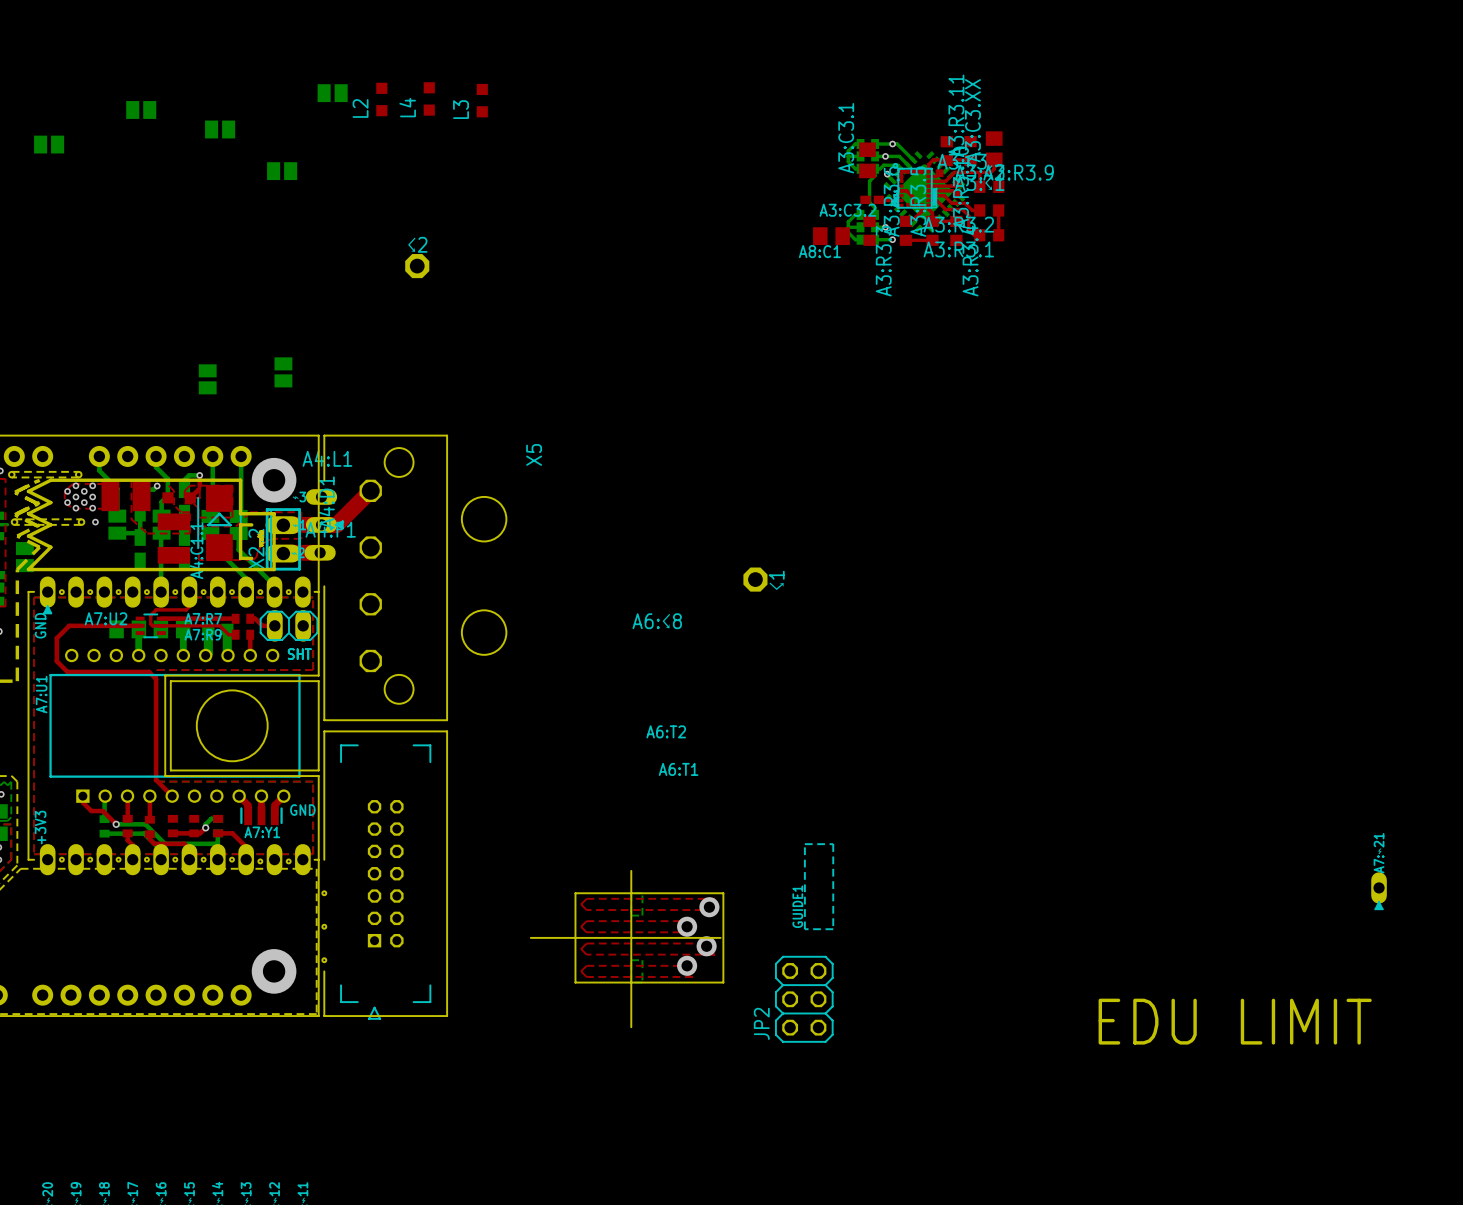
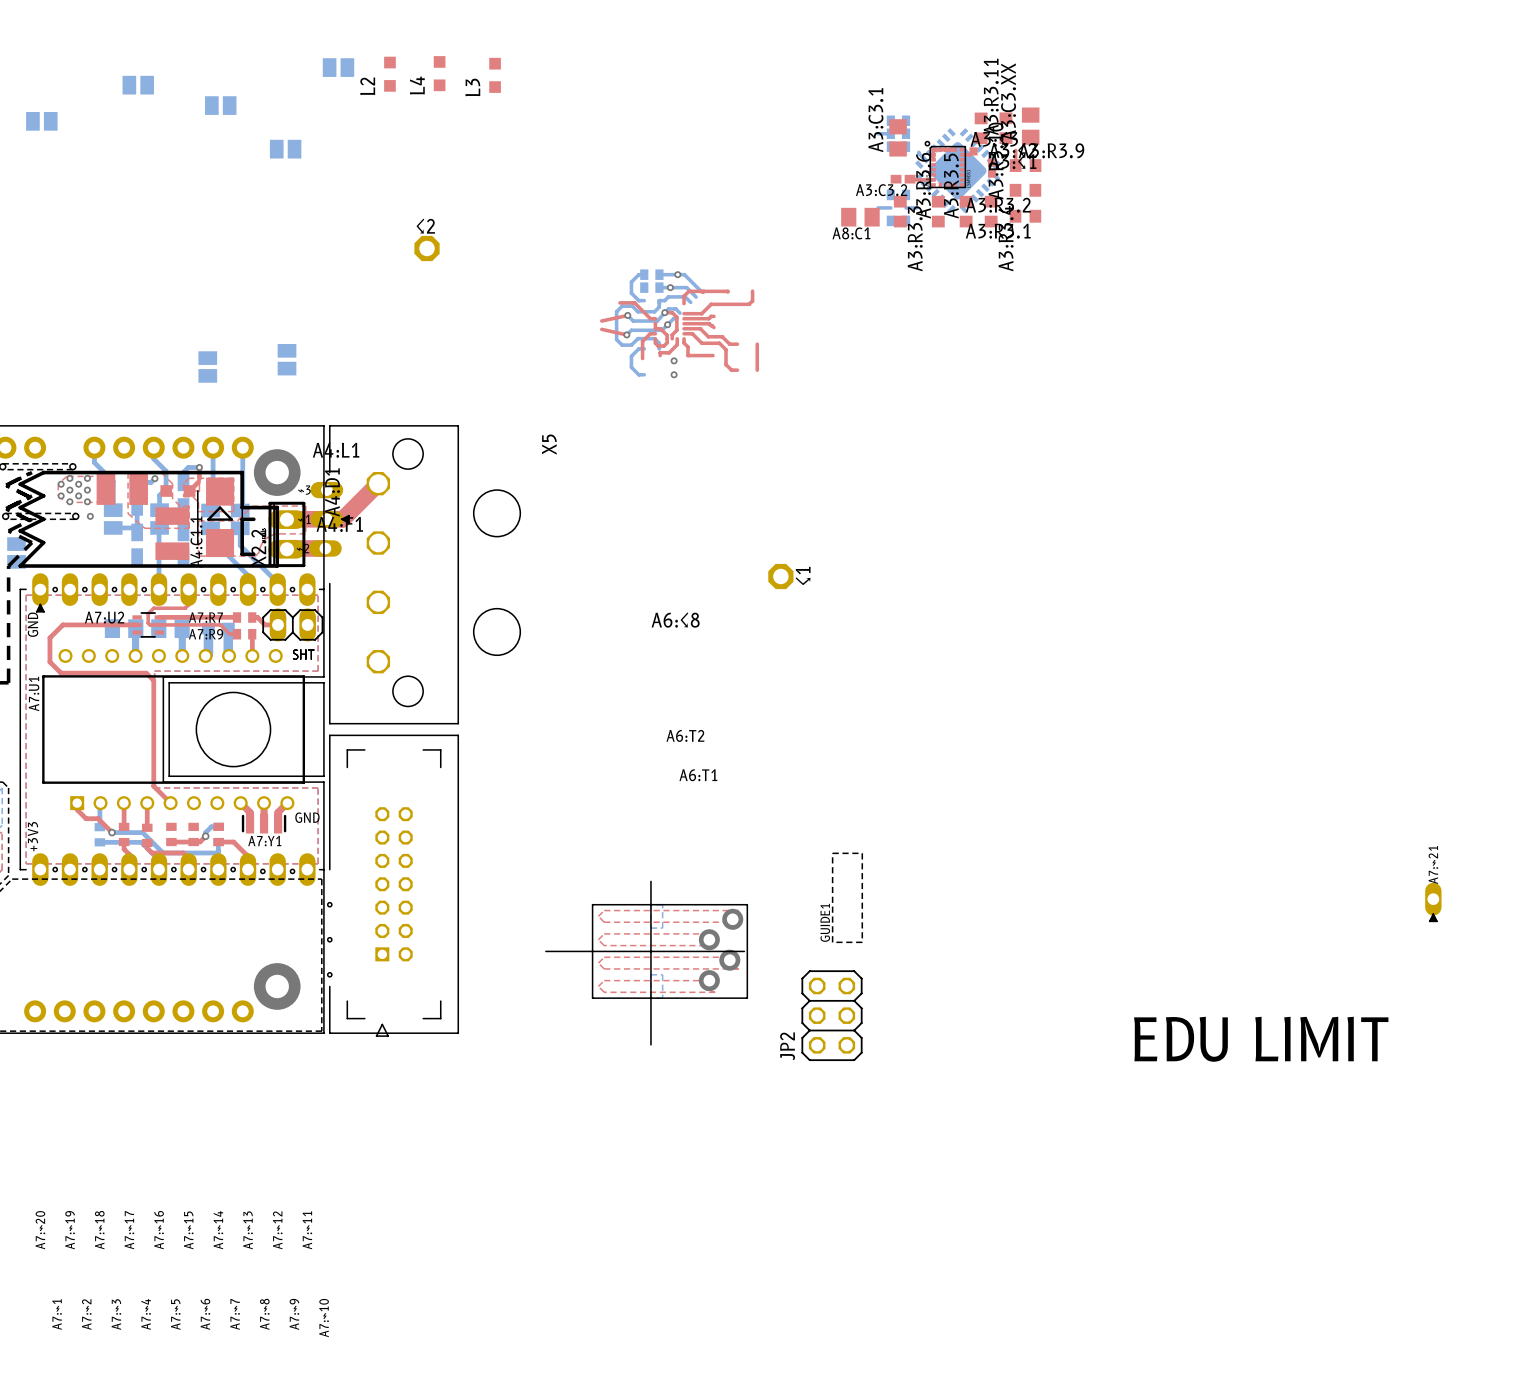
bottom track: (860, 144) (855, 144) (848, 151) (848, 161) (855, 168) (860, 168) -> (644, 274) (638, 274) (631, 282) (631, 293) (638, 300) (644, 300)
via: (892, 144) -> none
bottom track: (875, 145) (875, 144) (897, 144) (913, 160) -> none
bottom track: (875, 156) (899, 156) (908, 165) -> none
via: (885, 156) -> none
top track: (994, 159) (994, 169) (990, 172) (954, 172) (945, 181) (928, 181) -> none
top track: (970, 160) (933, 159) (928, 164) (928, 171) -> none
bottom track: (875, 168) (880, 168) (883, 165) (897, 165) (903, 170) -> none
bottom track: (875, 168) (874, 175) (869, 181) (869, 202) (875, 207) (875, 214) -> none
via: (887, 174) -> none
top track: (957, 183) (952, 186) (928, 186) -> none
top track: (901, 190) (906, 190) (912, 196) (912, 205) -> none
top track: (928, 190) (952, 190) (957, 194) -> none
top track: (928, 195) (944, 195) (951, 203) (965, 203) (972, 210) (979, 210) -> none
top track: (928, 200) (936, 200) (945, 209) (962, 209) (968, 215) (968, 229) (974, 235) (979, 235) -> none
top track: (922, 205) (922, 210) (914, 218) (905, 218) (905, 221) -> none
top track: (928, 205) (928, 209) (932, 213) (932, 221) (956, 221) -> none
top track: (998, 210) (998, 235) -> none
bottom track: (860, 214) (855, 214) (848, 221) (848, 232) (855, 239) (860, 239) -> (644, 348) (638, 348) (631, 356) (631, 367) (638, 374) (644, 374)
part: (867, 227) -> none
via: (885, 227) -> none
bottom track: (875, 239) (892, 239) -> none
via: (892, 239) -> none
top track: (905, 240) (932, 240) -> none
part: none -> (651, 274)
via: none -> (677, 274)
bottom track: none -> (659, 276) (659, 274) (684, 274) (701, 291)
part: none -> (651, 287)
bottom track: none -> (659, 287) (686, 287) (696, 297)
via: none -> (670, 287)
top track: none -> (752, 291) (752, 300) (749, 304) (711, 304) (701, 313) (684, 313)
top track: none -> (727, 292) (688, 291) (684, 296) (684, 303)
bottom track: none -> (659, 300) (664, 300) (668, 296) (685, 296) (690, 302)
bottom track: none -> (659, 300) (659, 307) (654, 311) (637, 311) (632, 306) (622, 306) (616, 311) (616, 339) (622, 345) (631, 345) (637, 338) (654, 338) (659, 343) (659, 348)
top track: none -> (619, 302) (634, 302) (650, 318) (655, 318)
top track: none -> (664, 312) (672, 312) (676, 317) (676, 330) (672, 334) (672, 338)
via: none -> (664, 312)
bottom track: none -> (679, 313) (675, 308) (668, 308) (657, 321) (633, 321) (627, 315)
top track: none -> (627, 315) (601, 321)
via: none -> (627, 315)
top track: none -> (713, 316) (708, 318) (684, 318)
bottom track: none -> (674, 318) (662, 330) (631, 330) (626, 334)
top track: none -> (655, 323) (655, 328) (660, 328) (667, 335) (667, 342) (663, 346) (658, 346) (655, 343) (655, 338)
top track: none -> (684, 323) (709, 323) (713, 327)
via: none -> (667, 324)
top track: none -> (684, 328) (700, 328) (708, 336) (722, 336) (729, 344) (737, 344)
top track: none -> (601, 329) (626, 334)
top track: none -> (655, 333) (650, 333) (642, 341) (642, 358)
top track: none -> (684, 333) (692, 333) (701, 343) (719, 343) (726, 349) (726, 364) (731, 370) (737, 370)
via: none -> (626, 334)
top track: none -> (677, 338) (677, 344) (669, 352) (660, 352) (660, 355)
top track: none -> (684, 338) (684, 343) (688, 346) (688, 355) (713, 355)
top track: none -> (757, 344) (757, 370)
via: none -> (674, 360)
via: none -> (674, 374)

